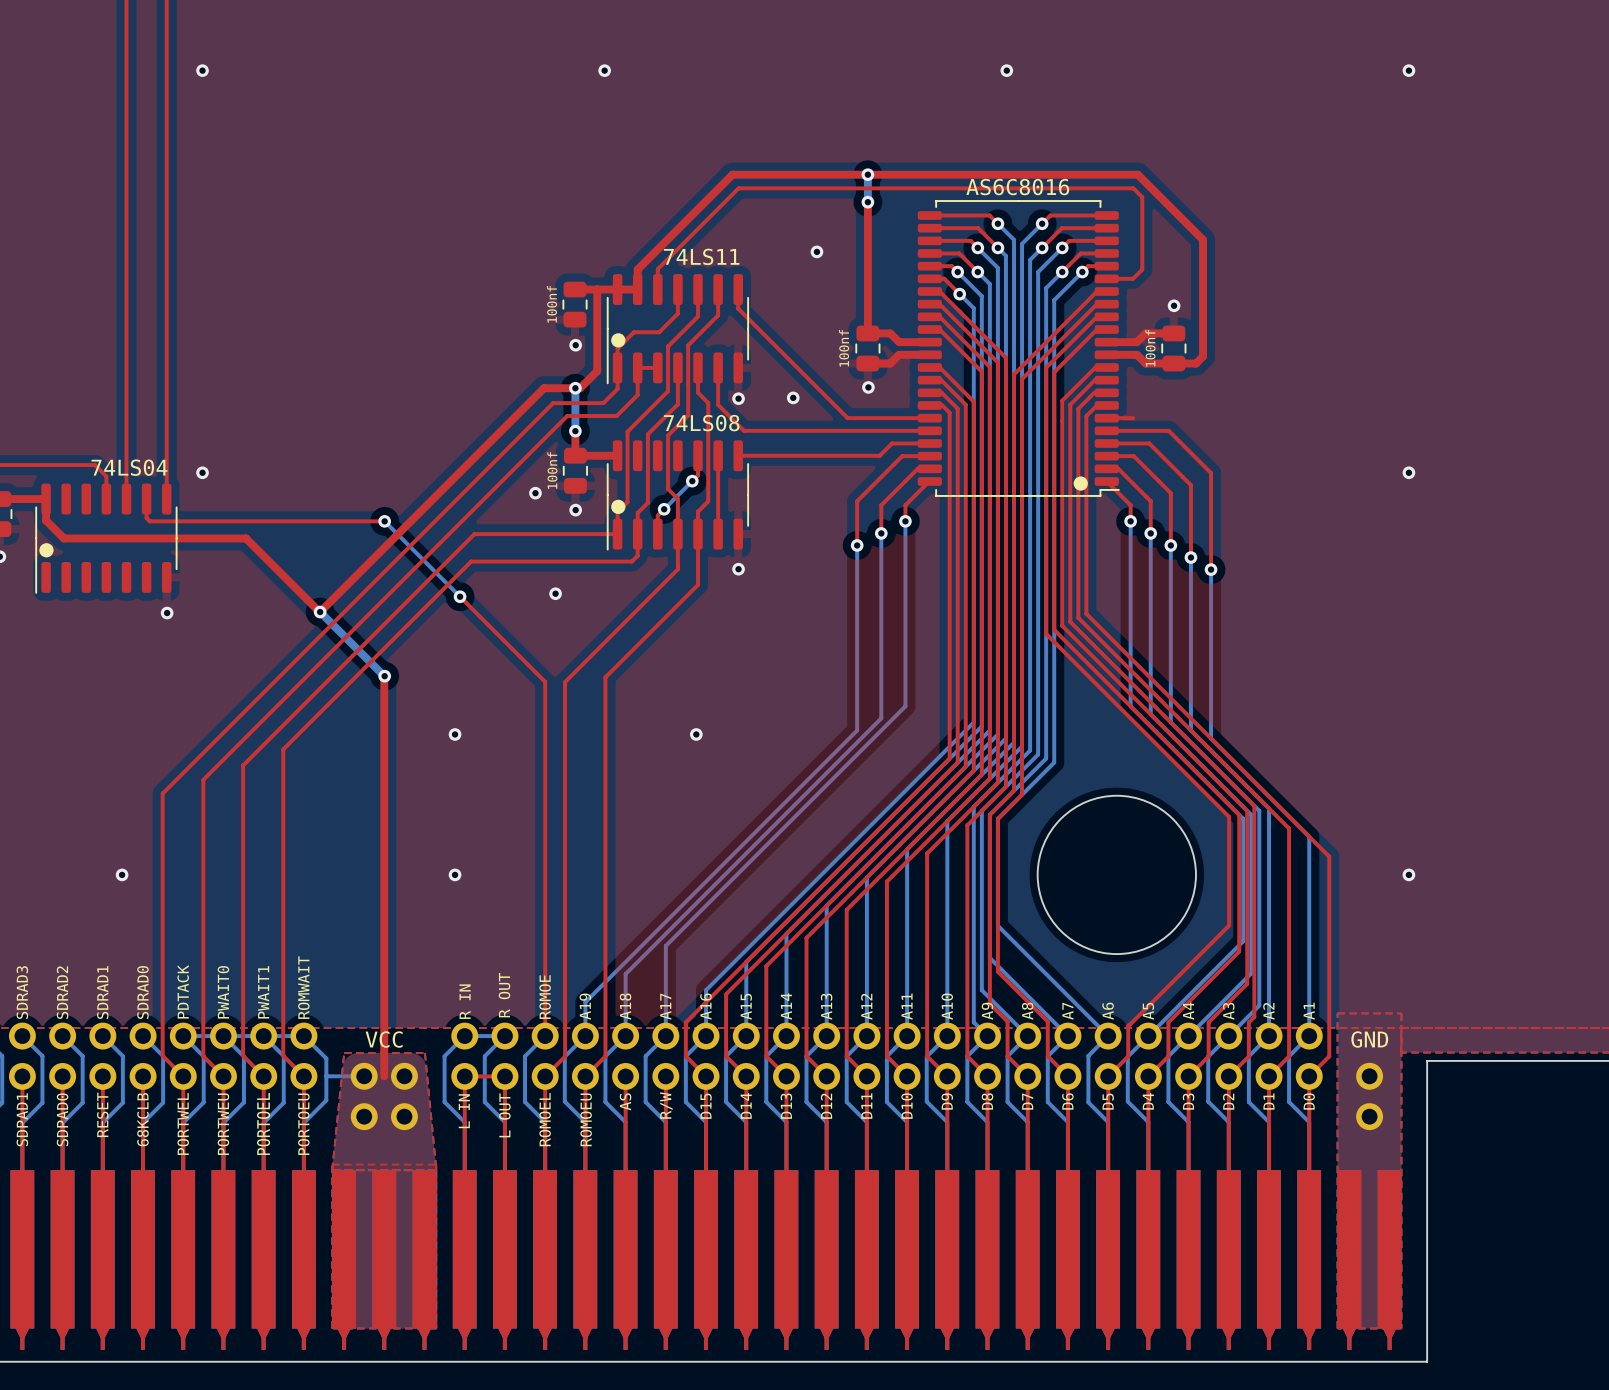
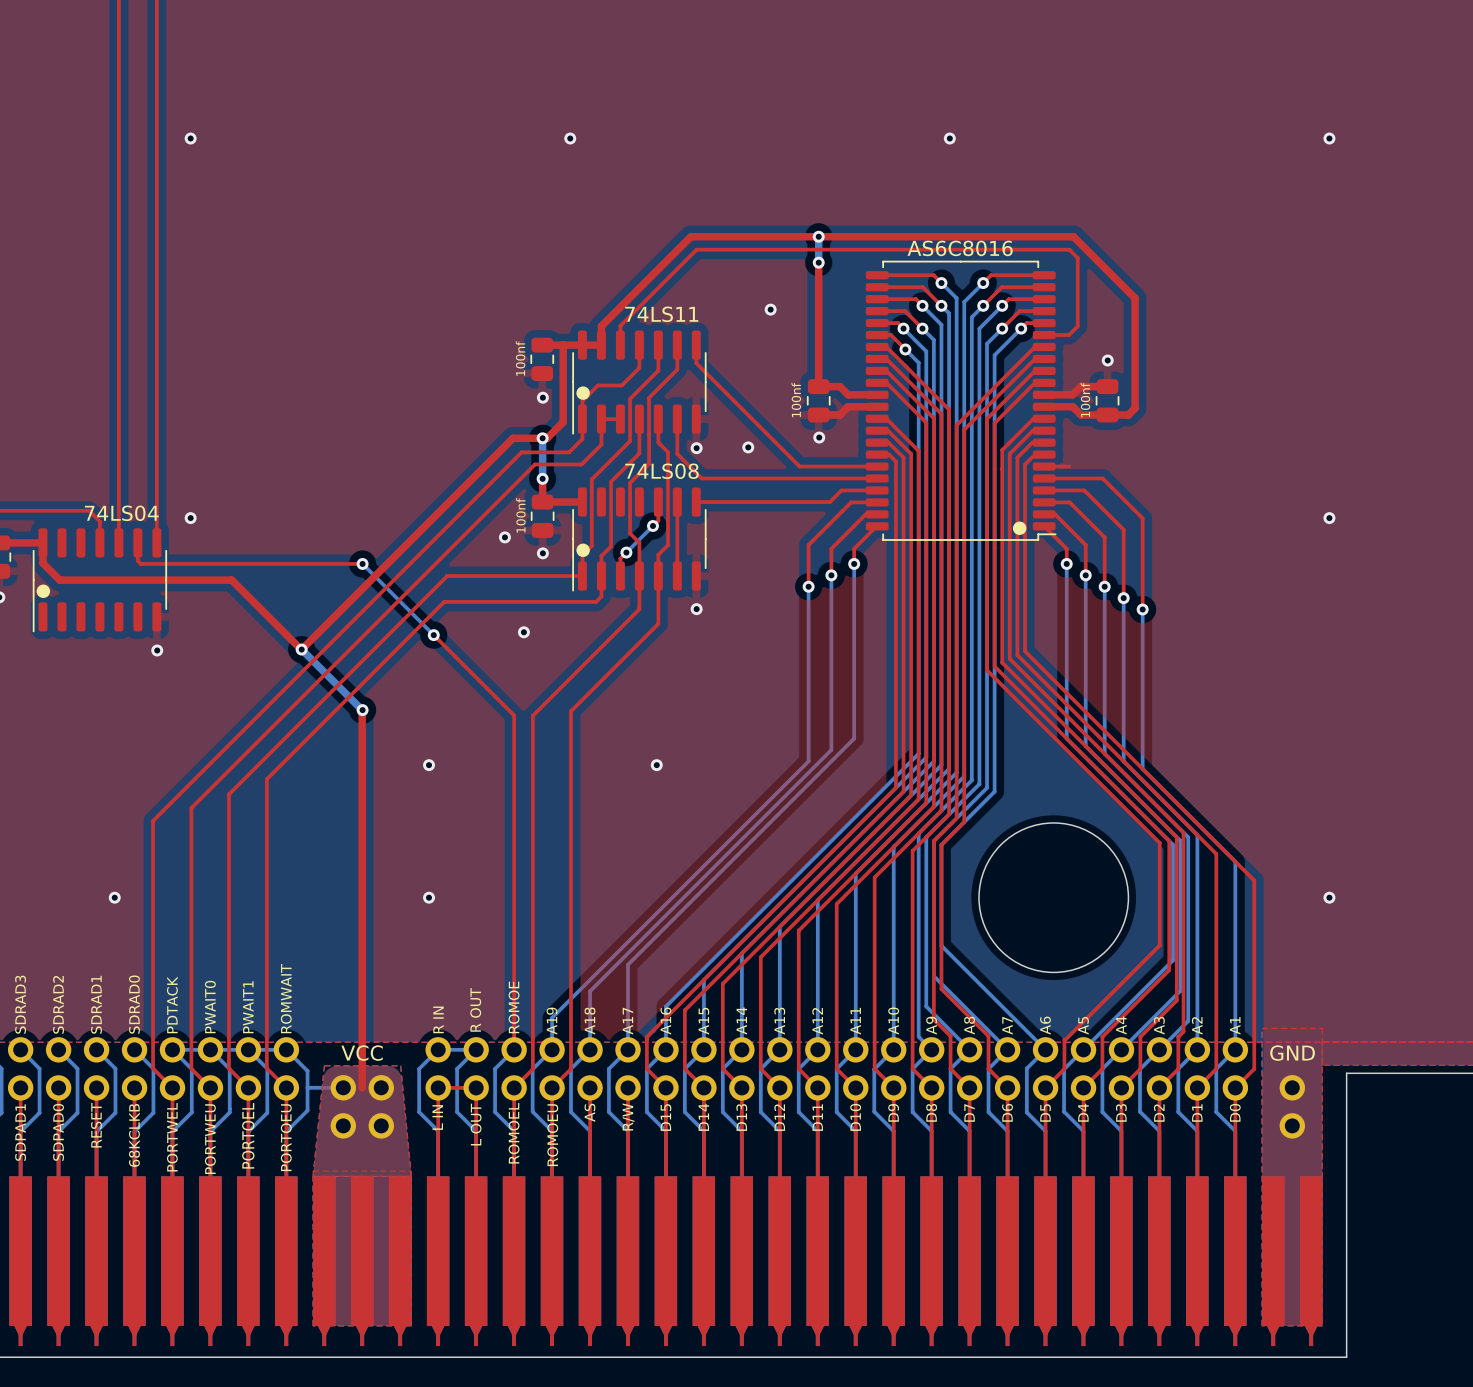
text: 68KCLB (142, 1119) -> 68KCLKB (134, 1135)

